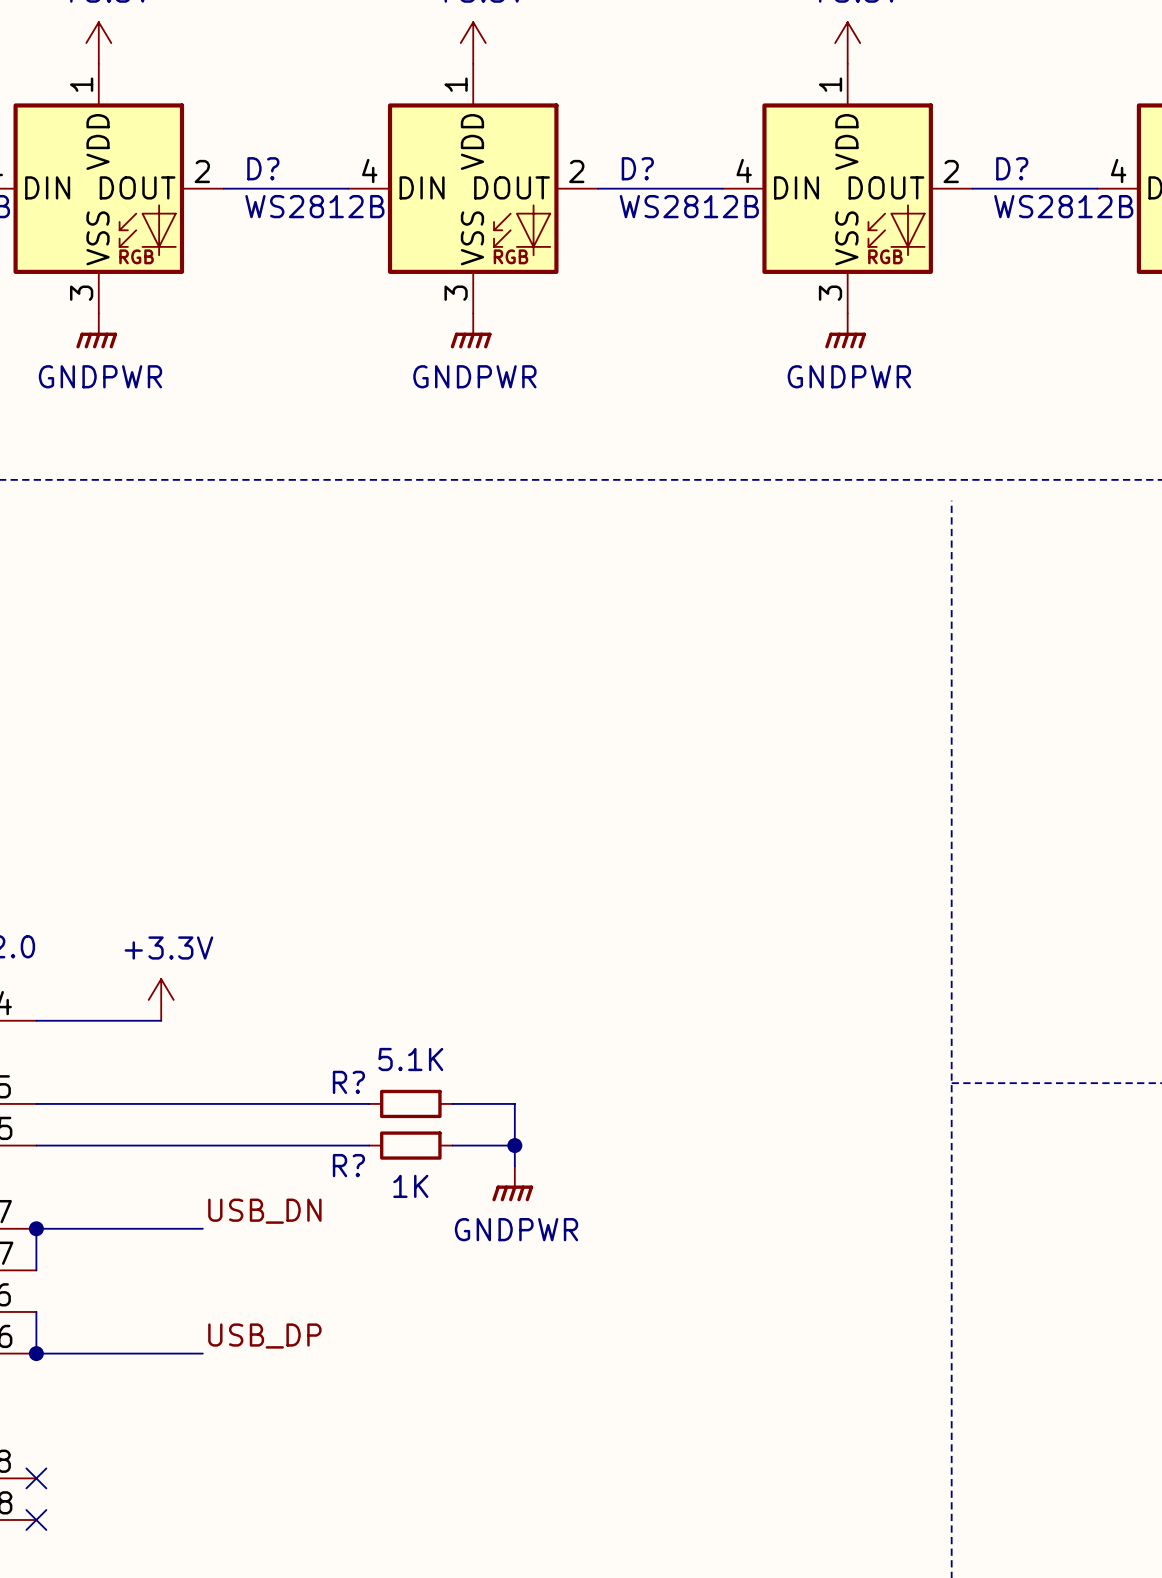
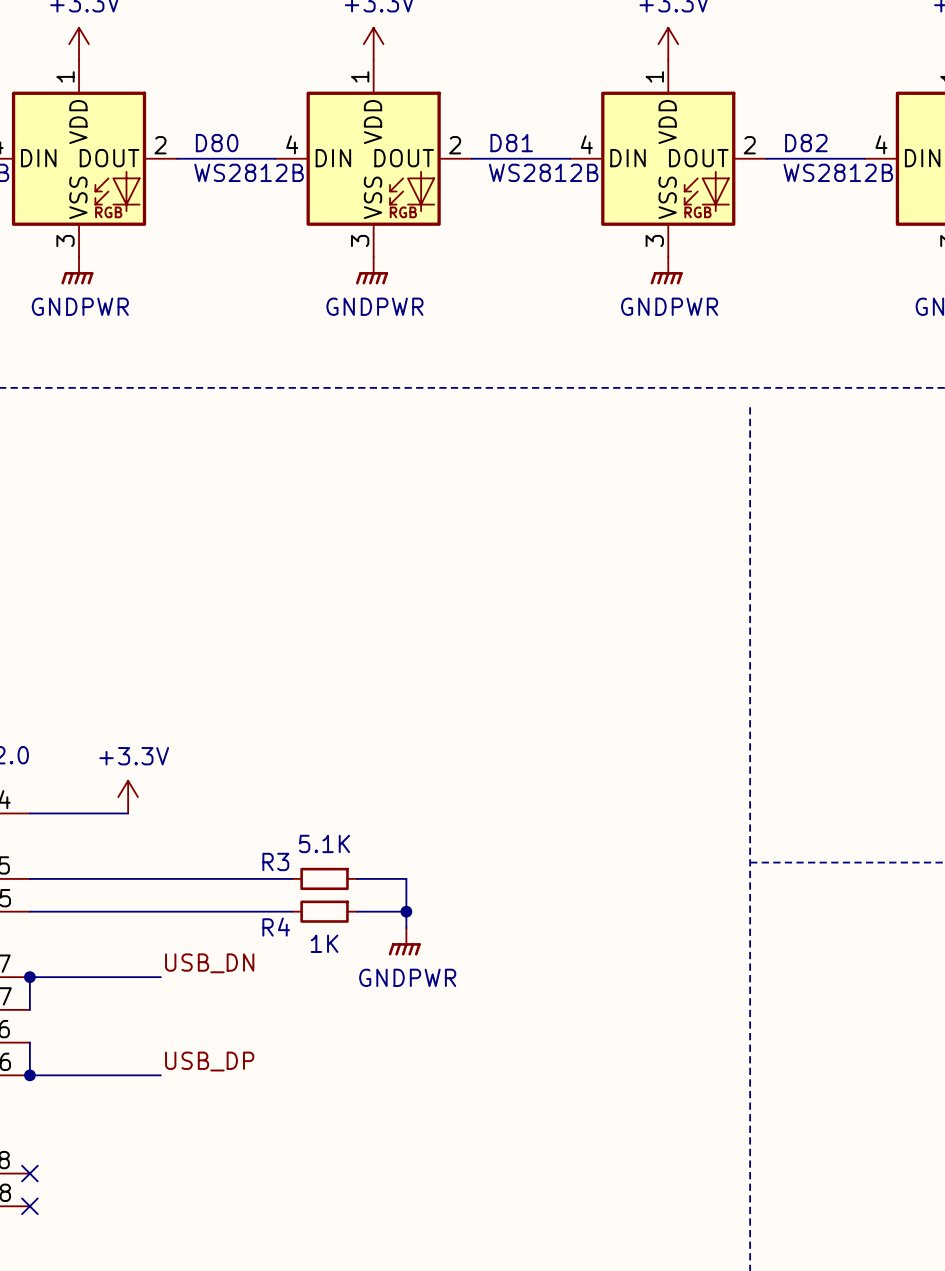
D? name: D? (263, 168) -> D80 (217, 143)
D? name: D? (637, 168) -> D81 (511, 143)
D? name: D? (1012, 168) -> D82 (806, 143)
R? name: R? (348, 1082) -> R3 (275, 861)
R? name: R? (348, 1165) -> R4 (276, 927)

